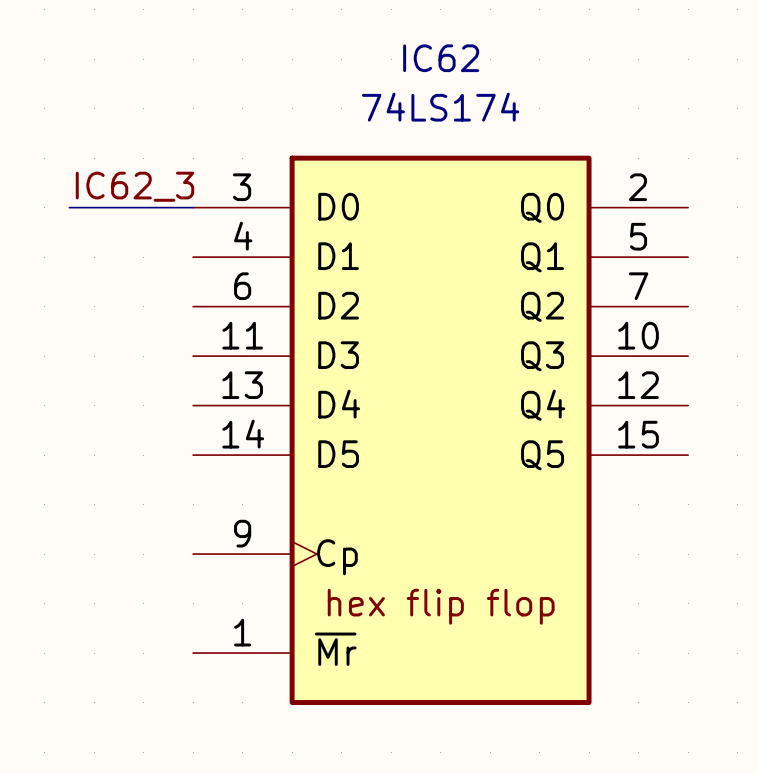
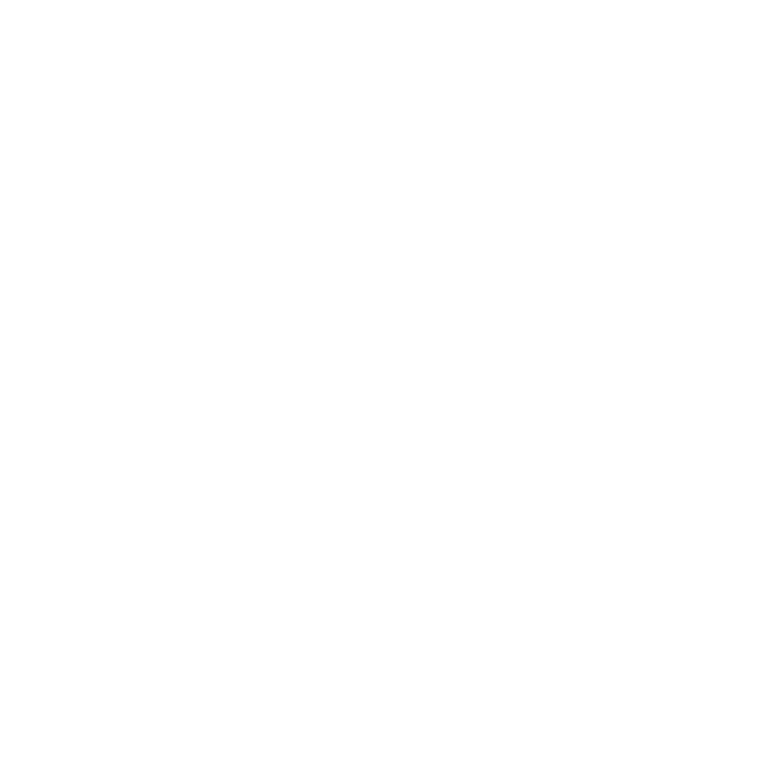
label: IC62_3 (134, 186) -> none
wire: (69, 207) (193, 207) -> none
IC62: 74LS174 (440, 430) -> none

